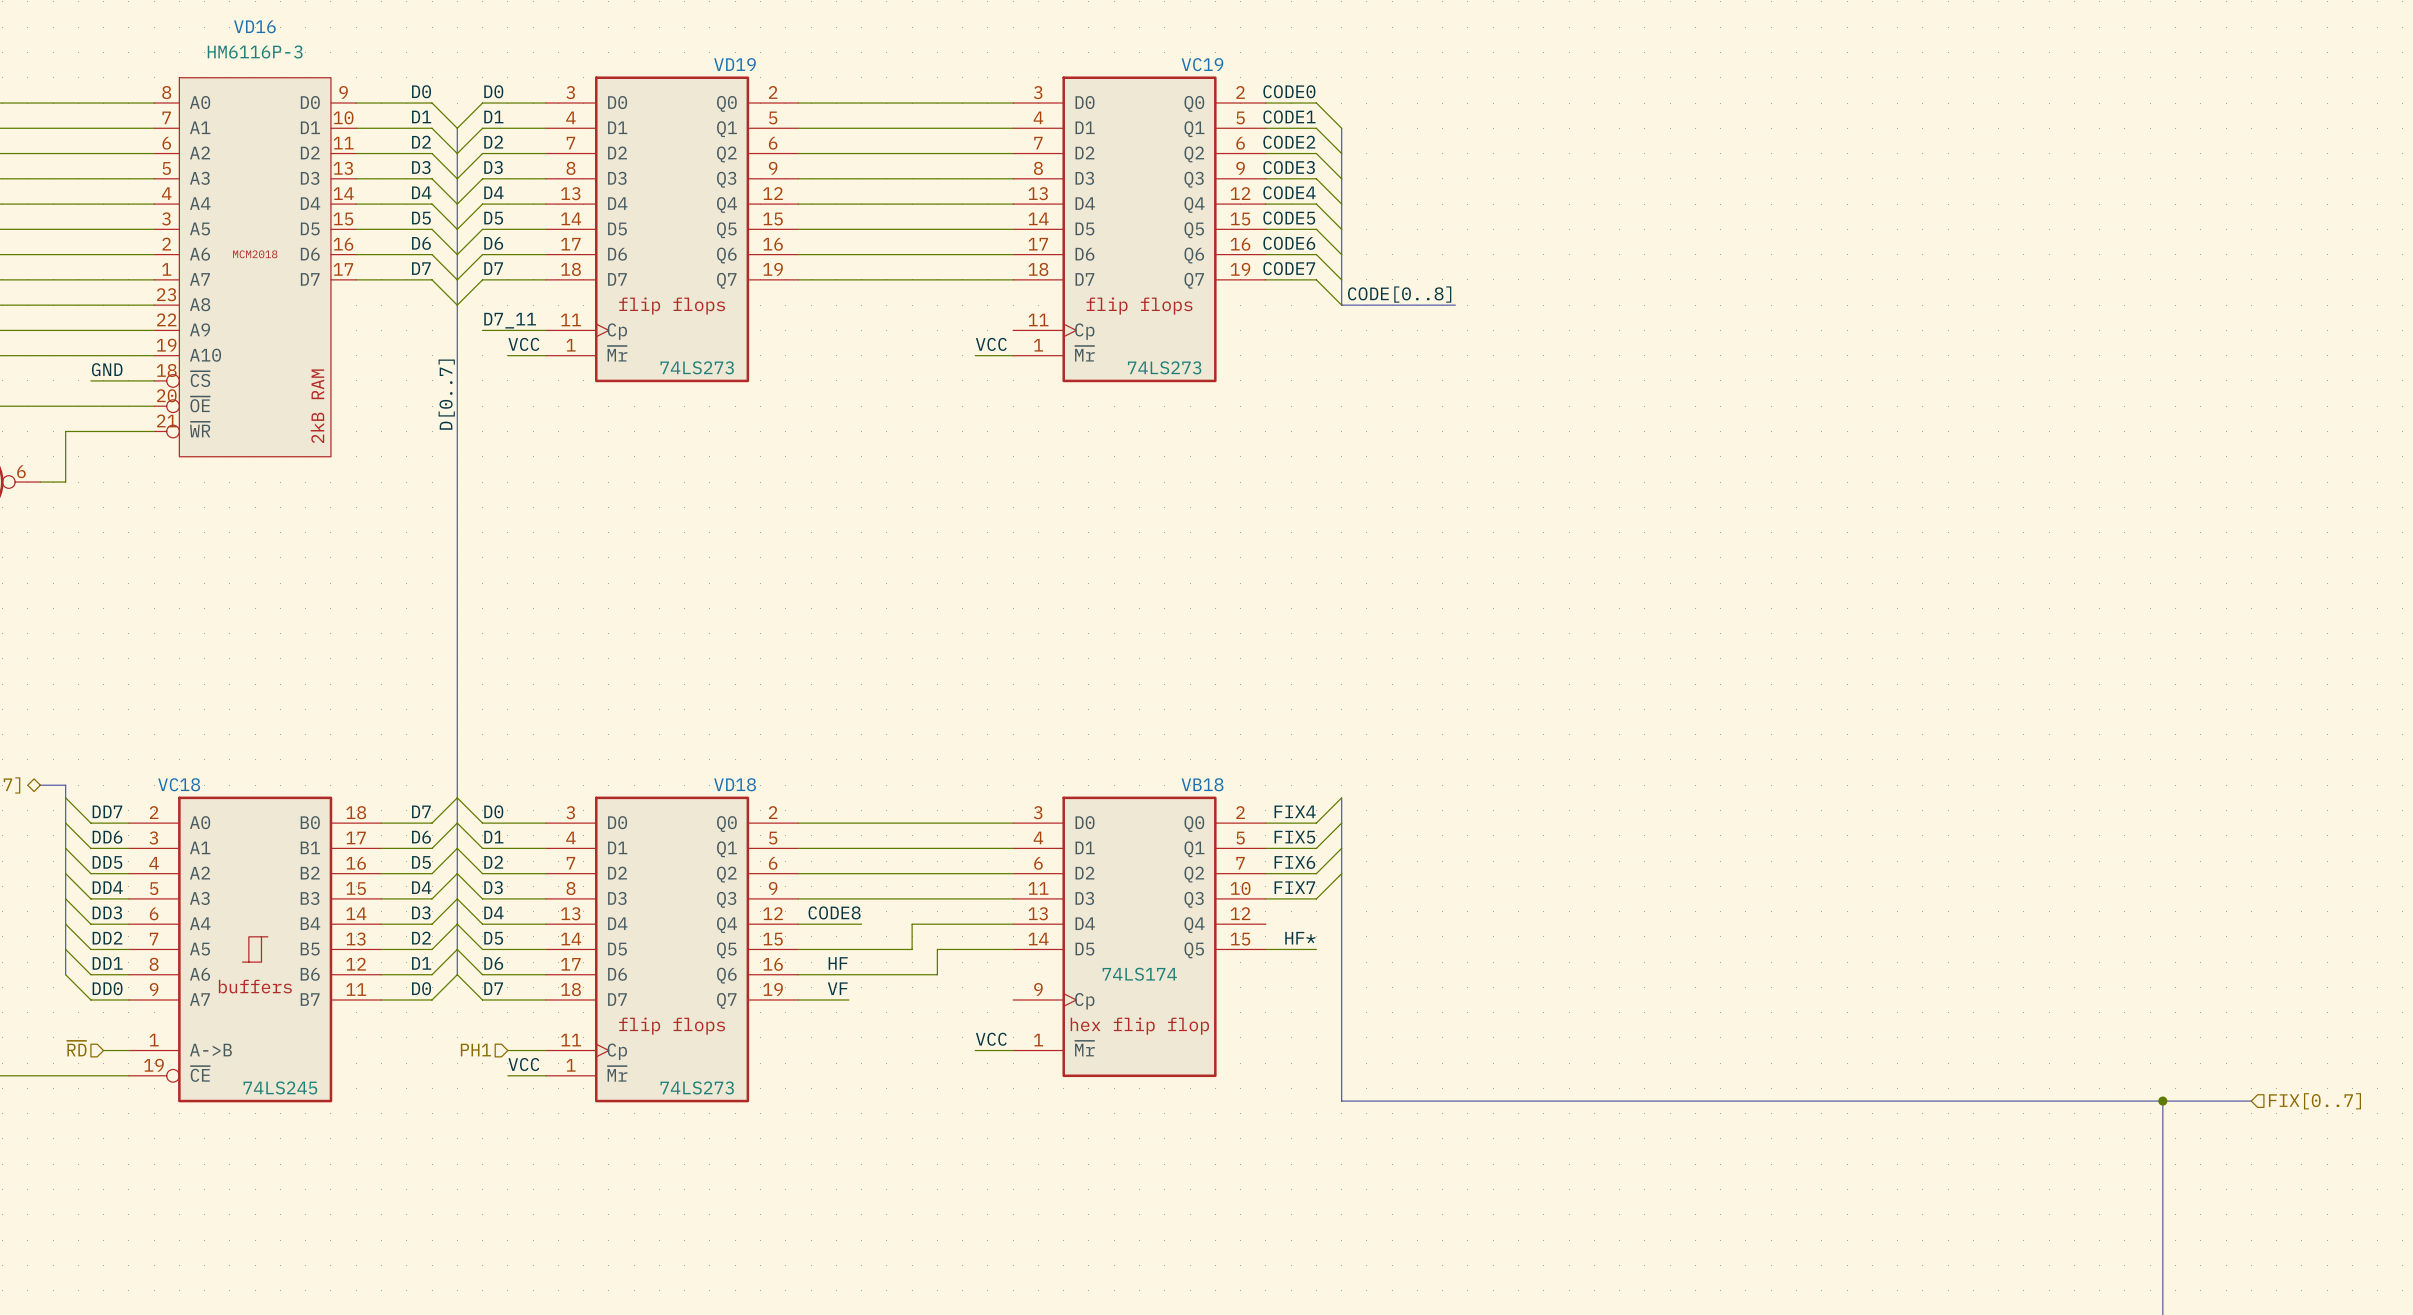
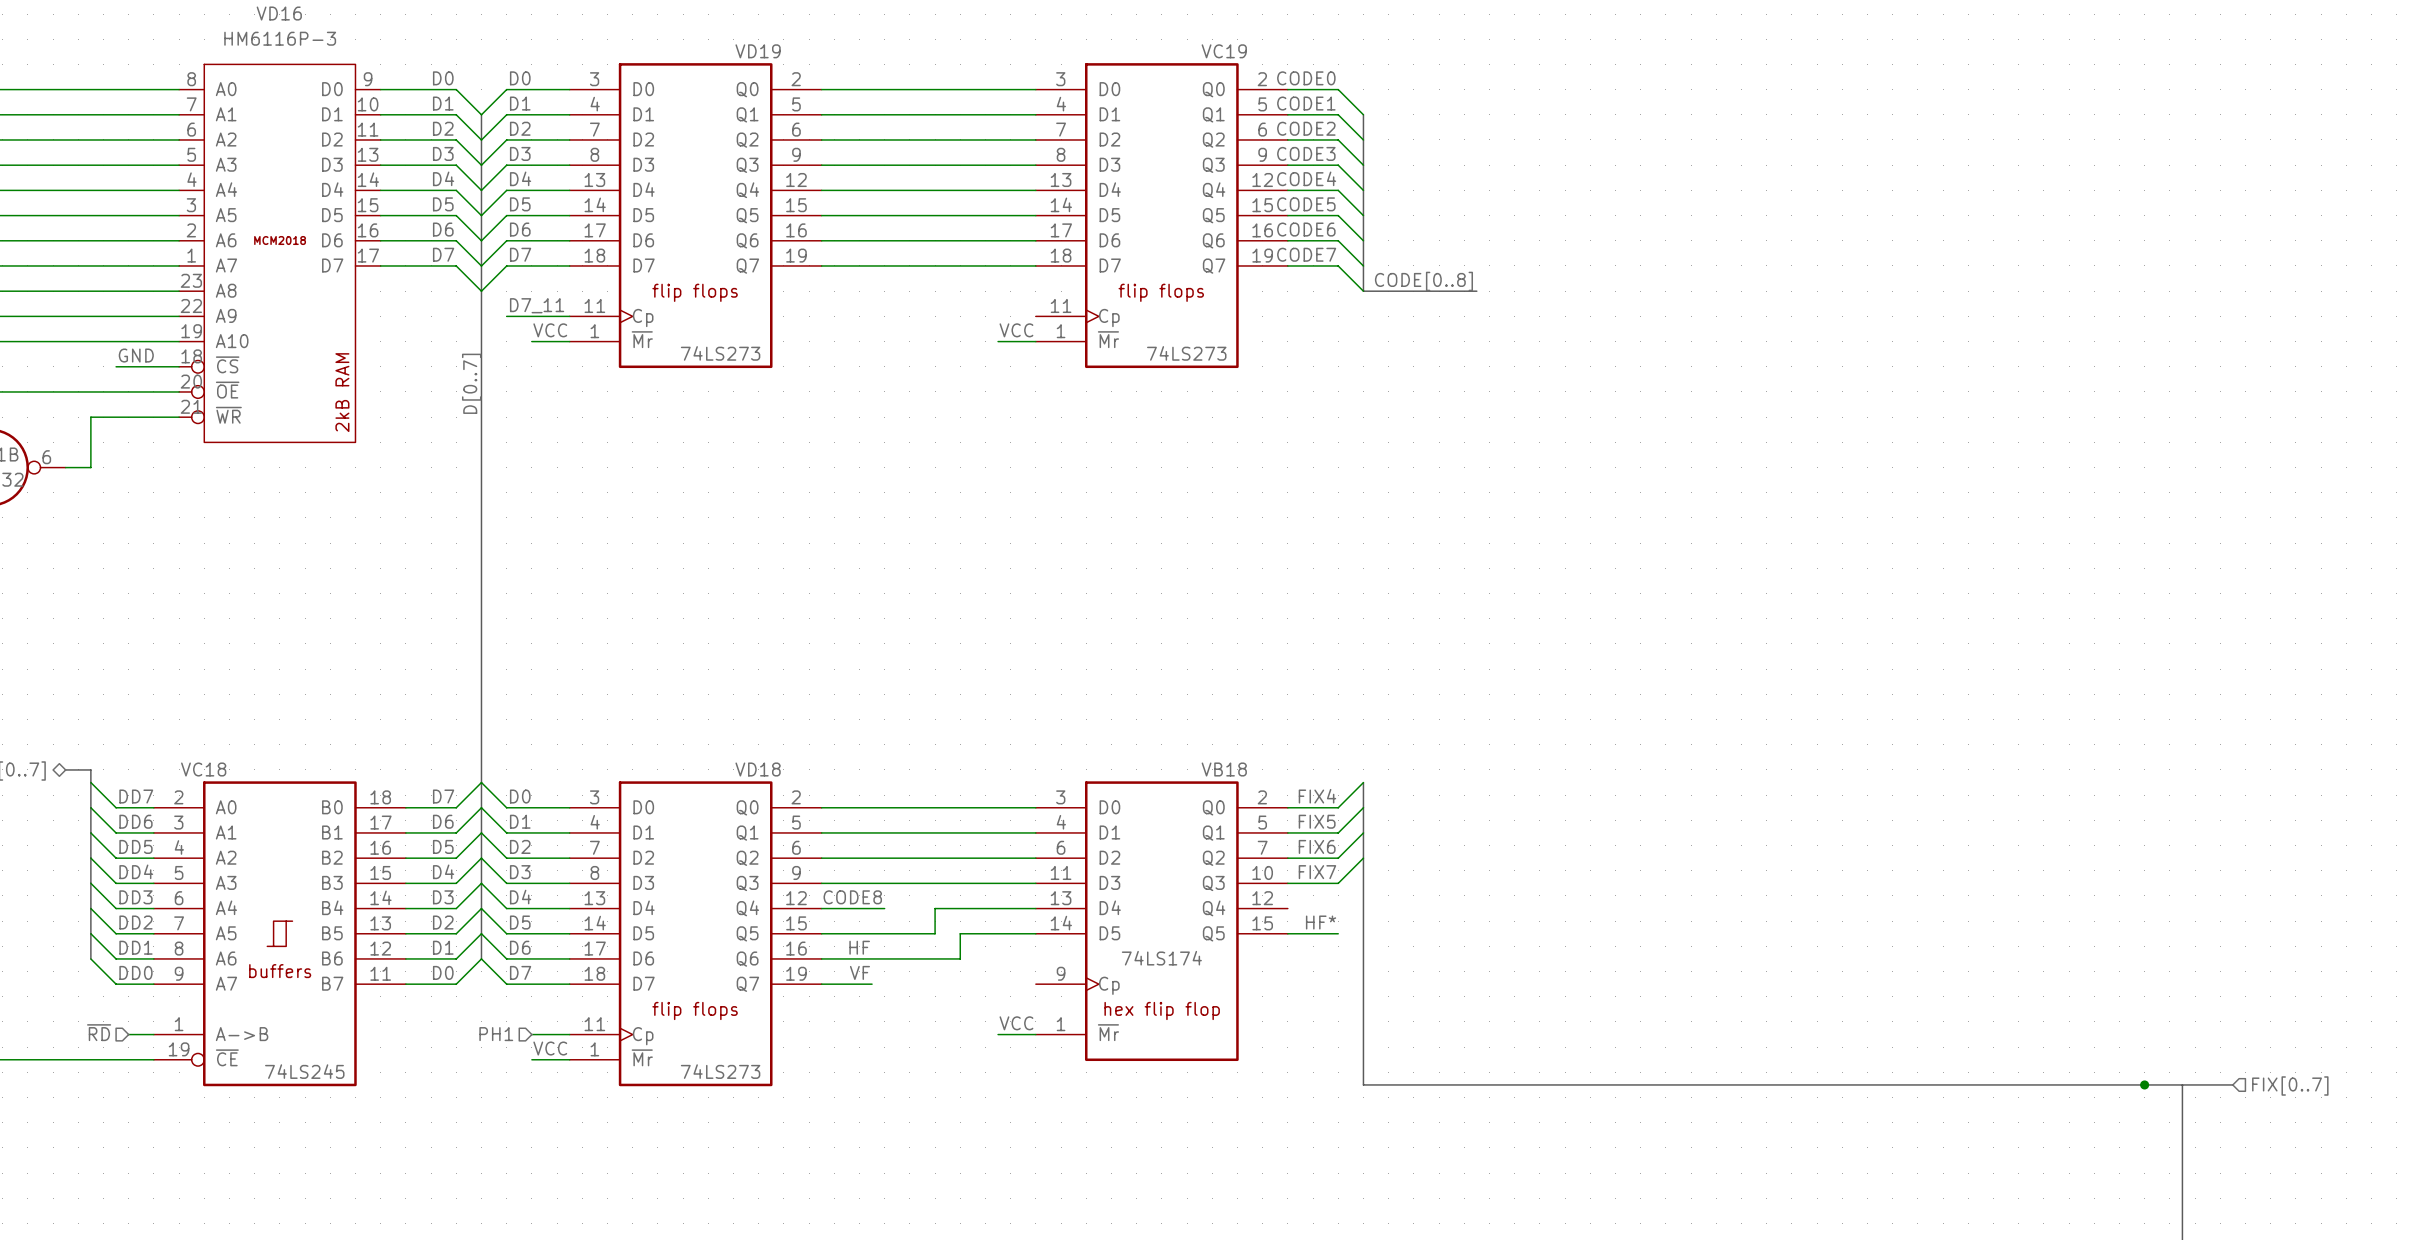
junction position: (2162, 1101) -> (2144, 1084)
bus: (2213, 1101) (2251, 1101) -> none
hierarchical label position: FIX[0..7] (2314, 1101) -> FIX[0..7] (2290, 1085)

